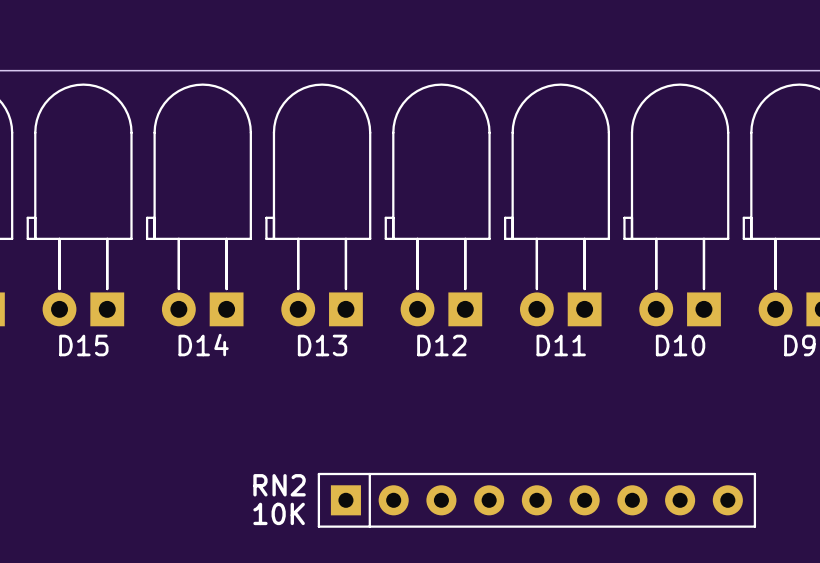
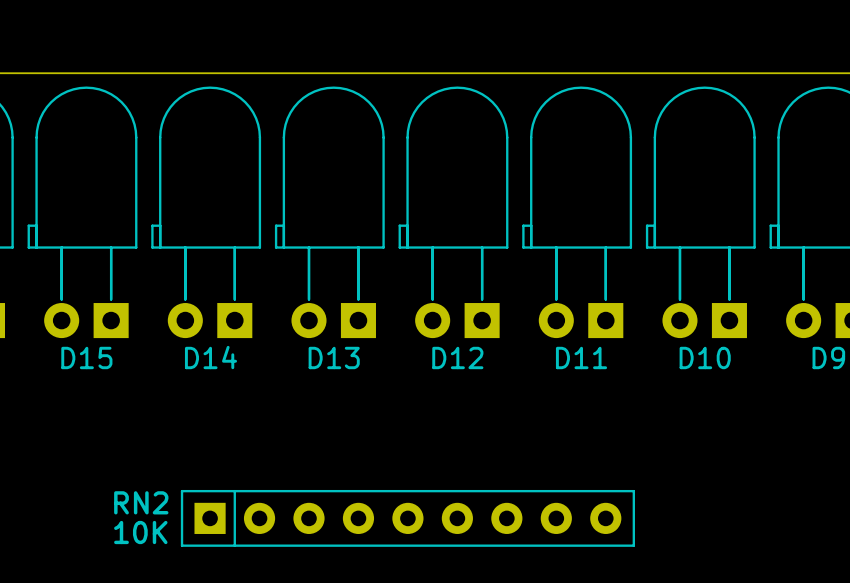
RN2 position: (536, 500) -> (407, 518)

